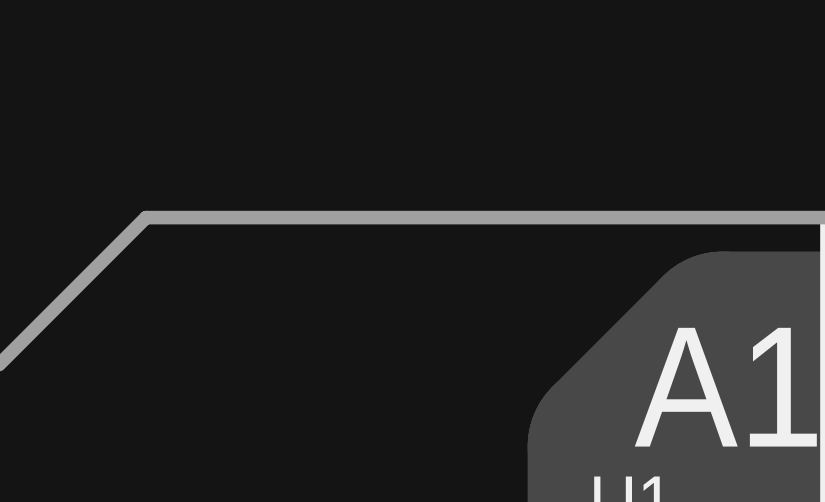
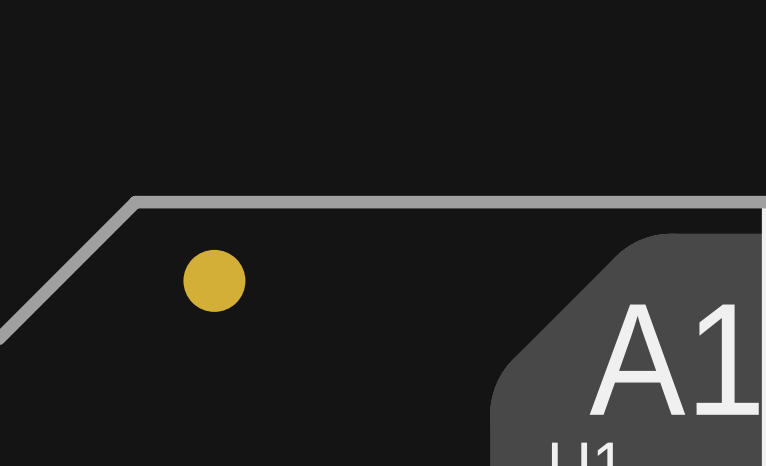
part: none -> (214, 280)

